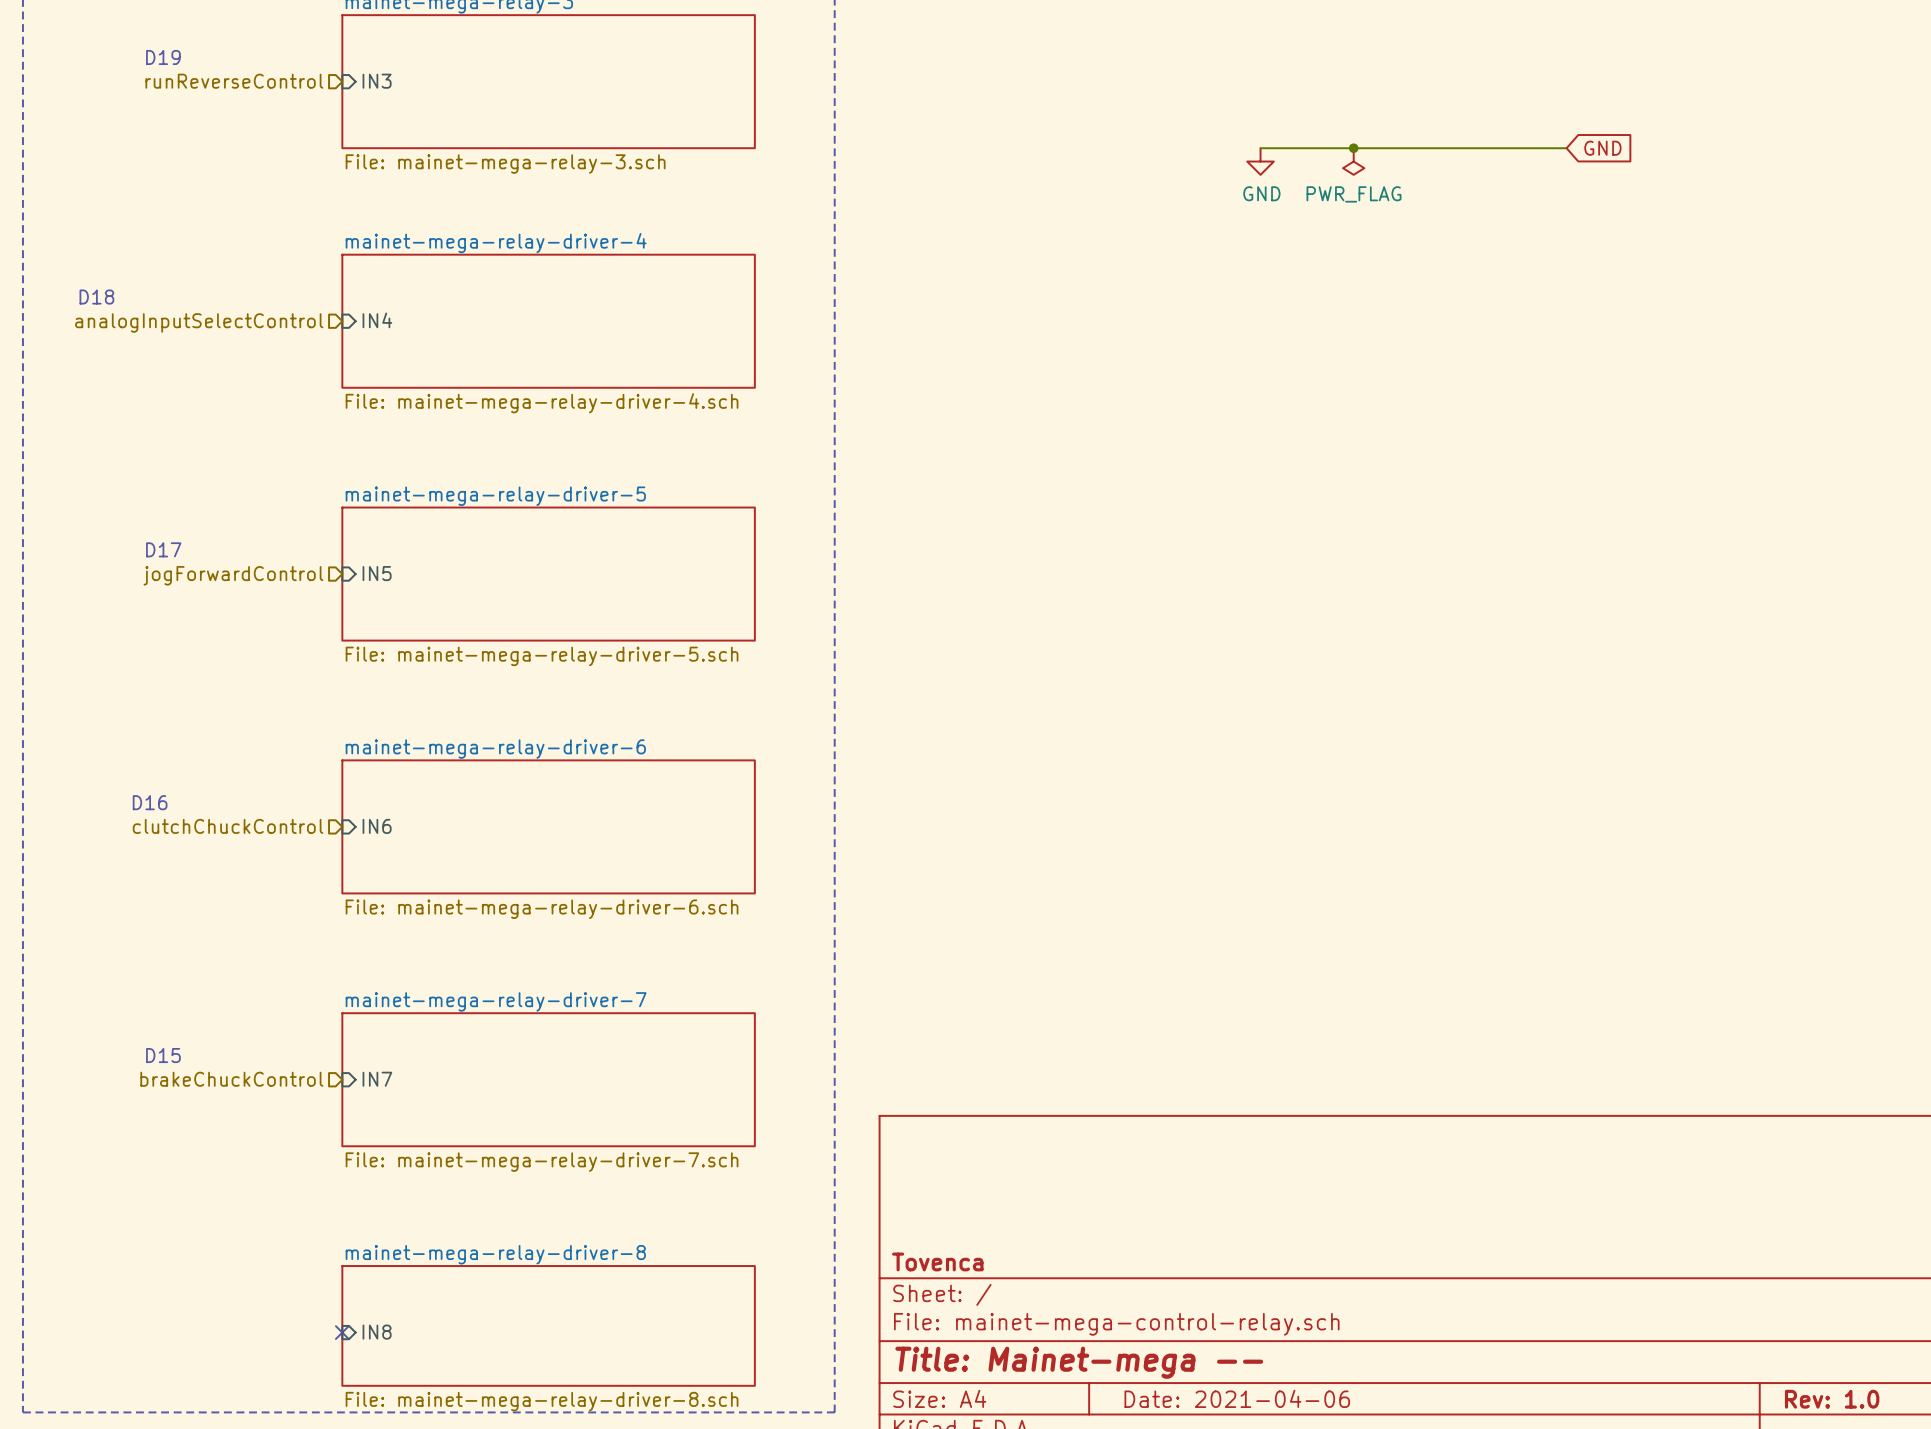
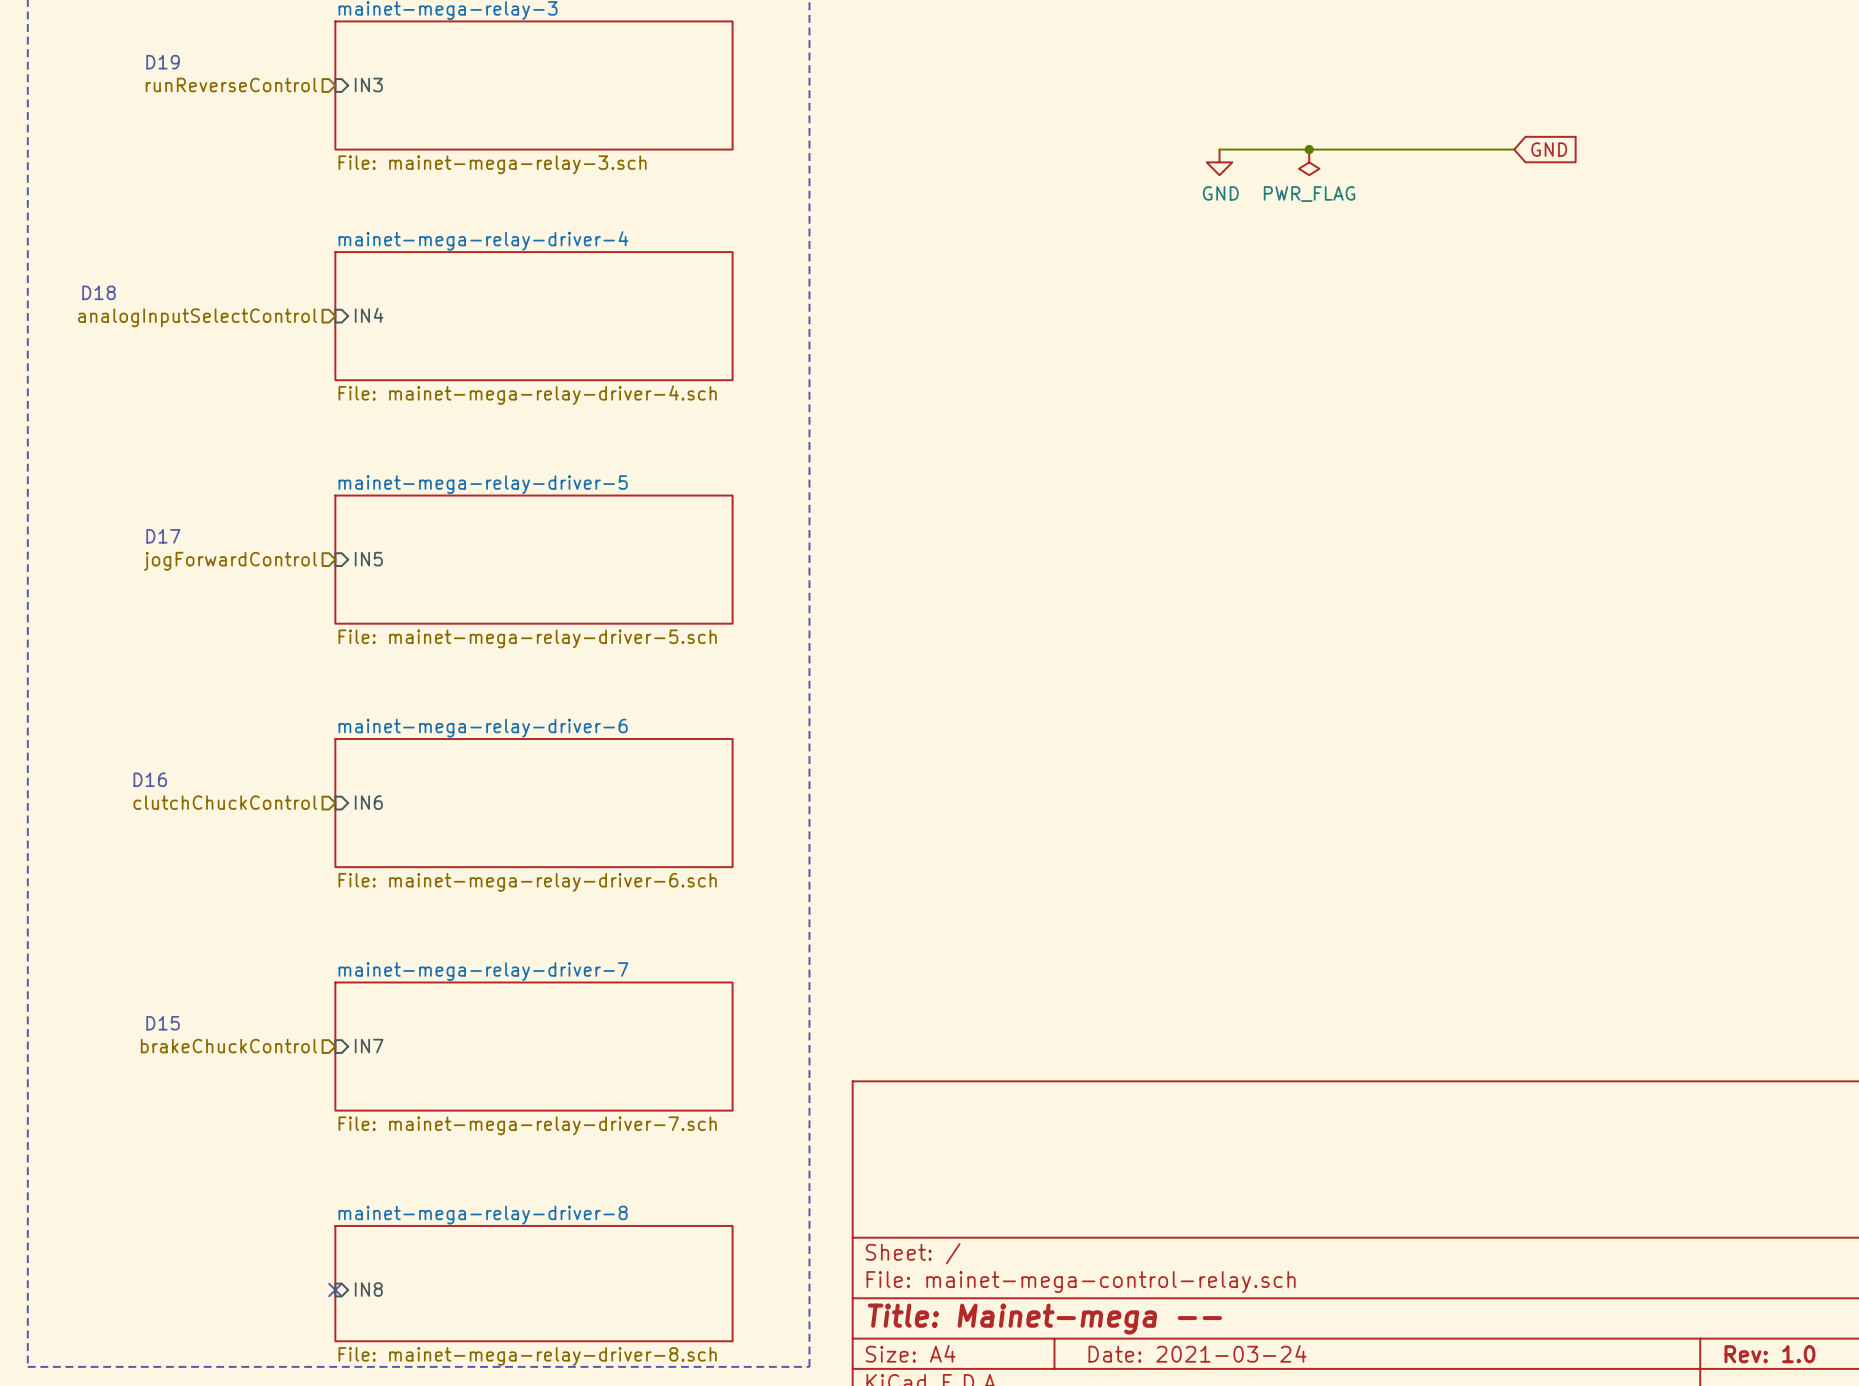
title block: Tovenca (937, 1261) -> none
title block: Date: 2021-04-06 (1237, 1398) -> Date: 2021-03-24 (1197, 1353)

